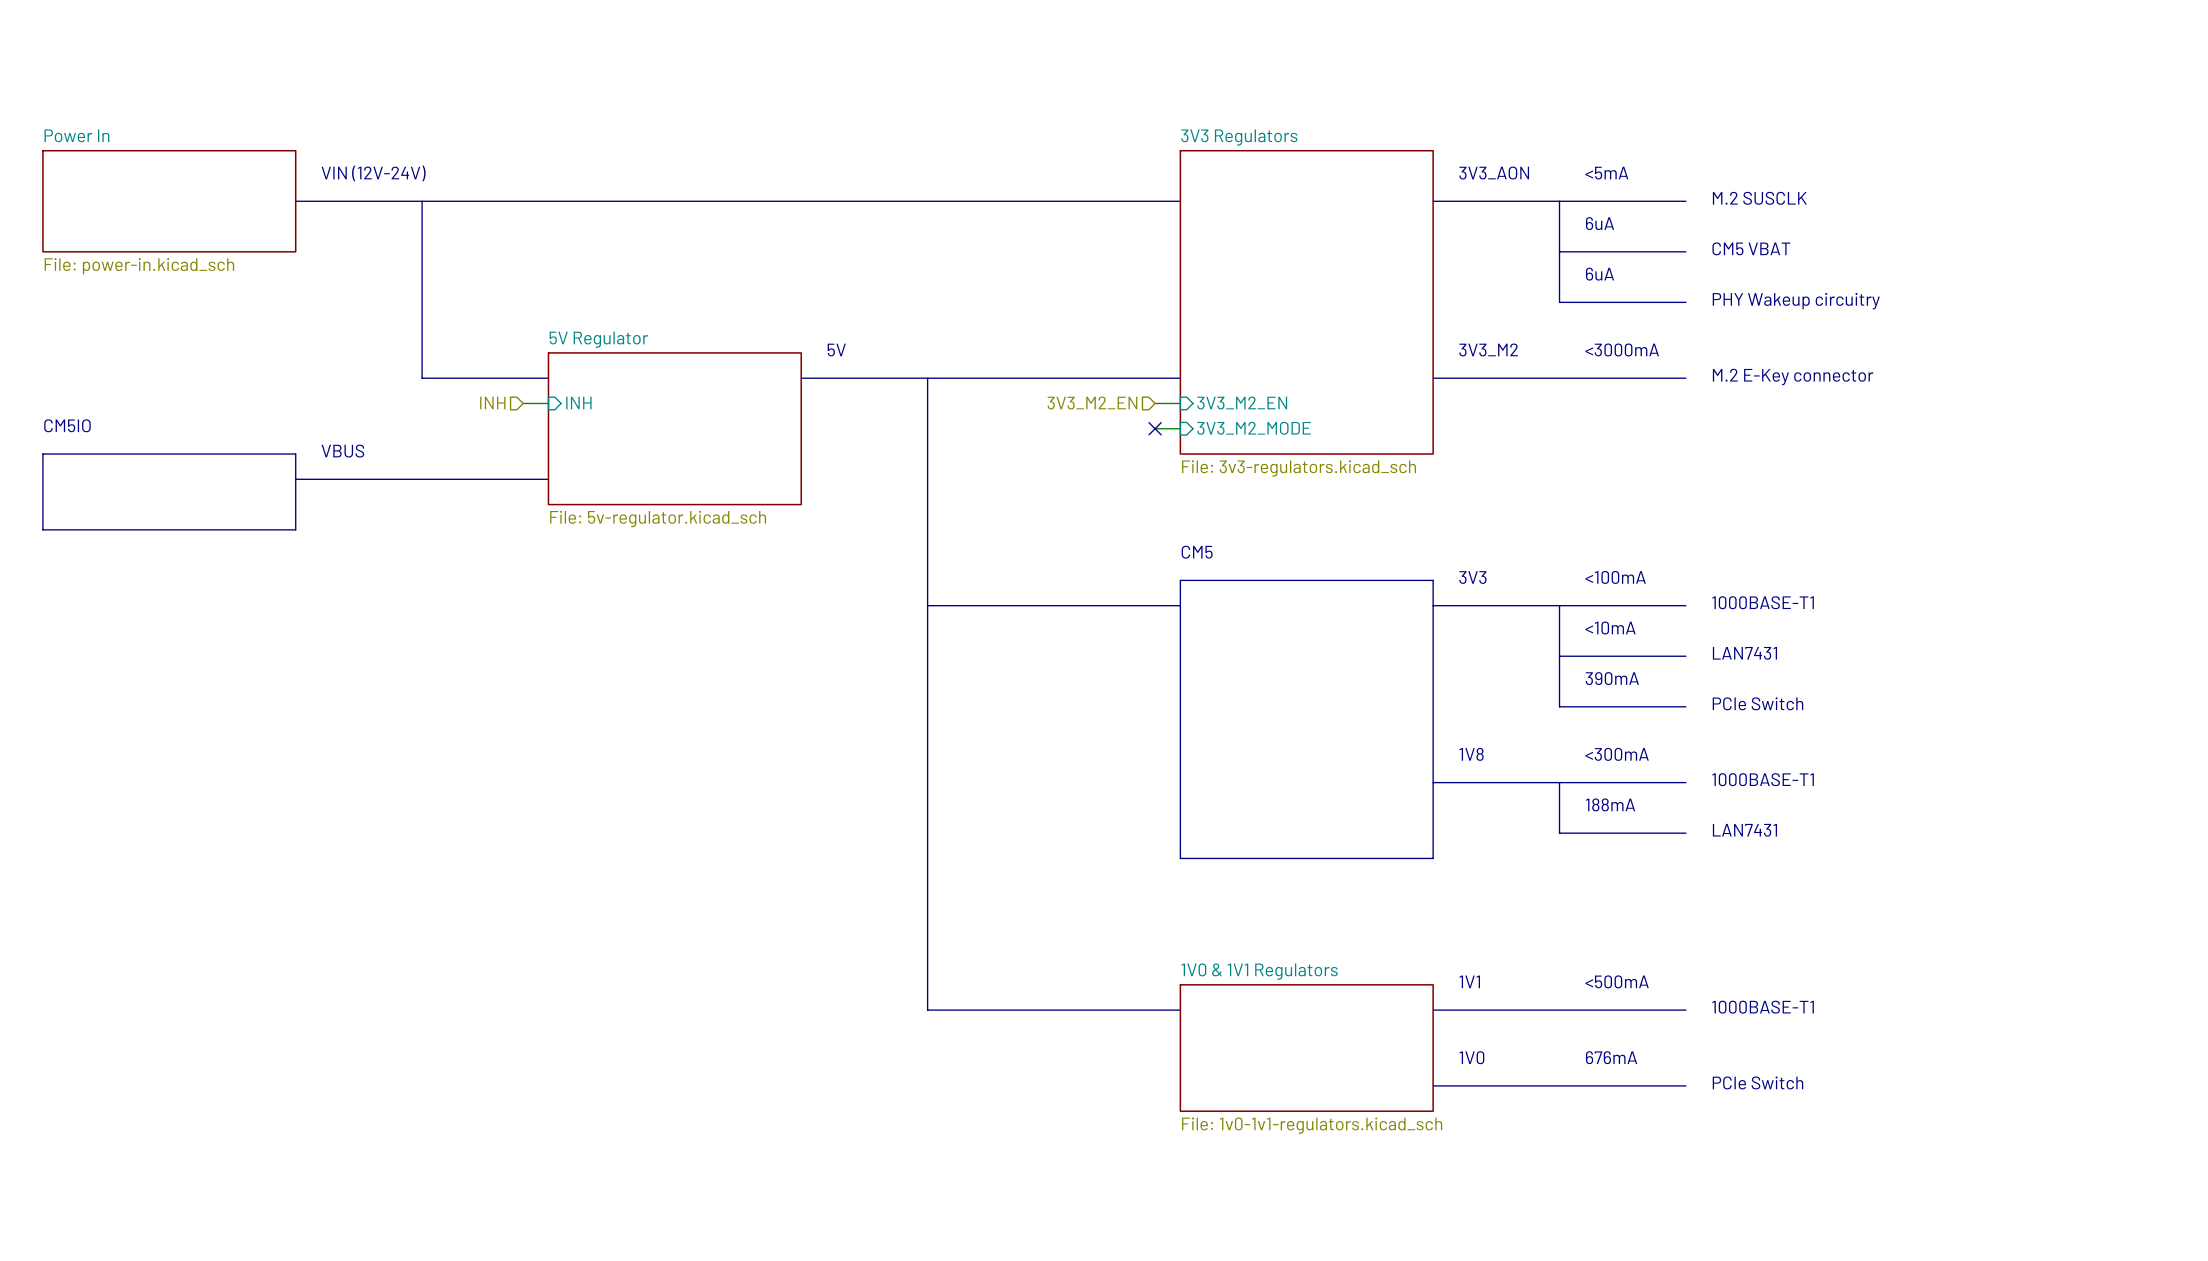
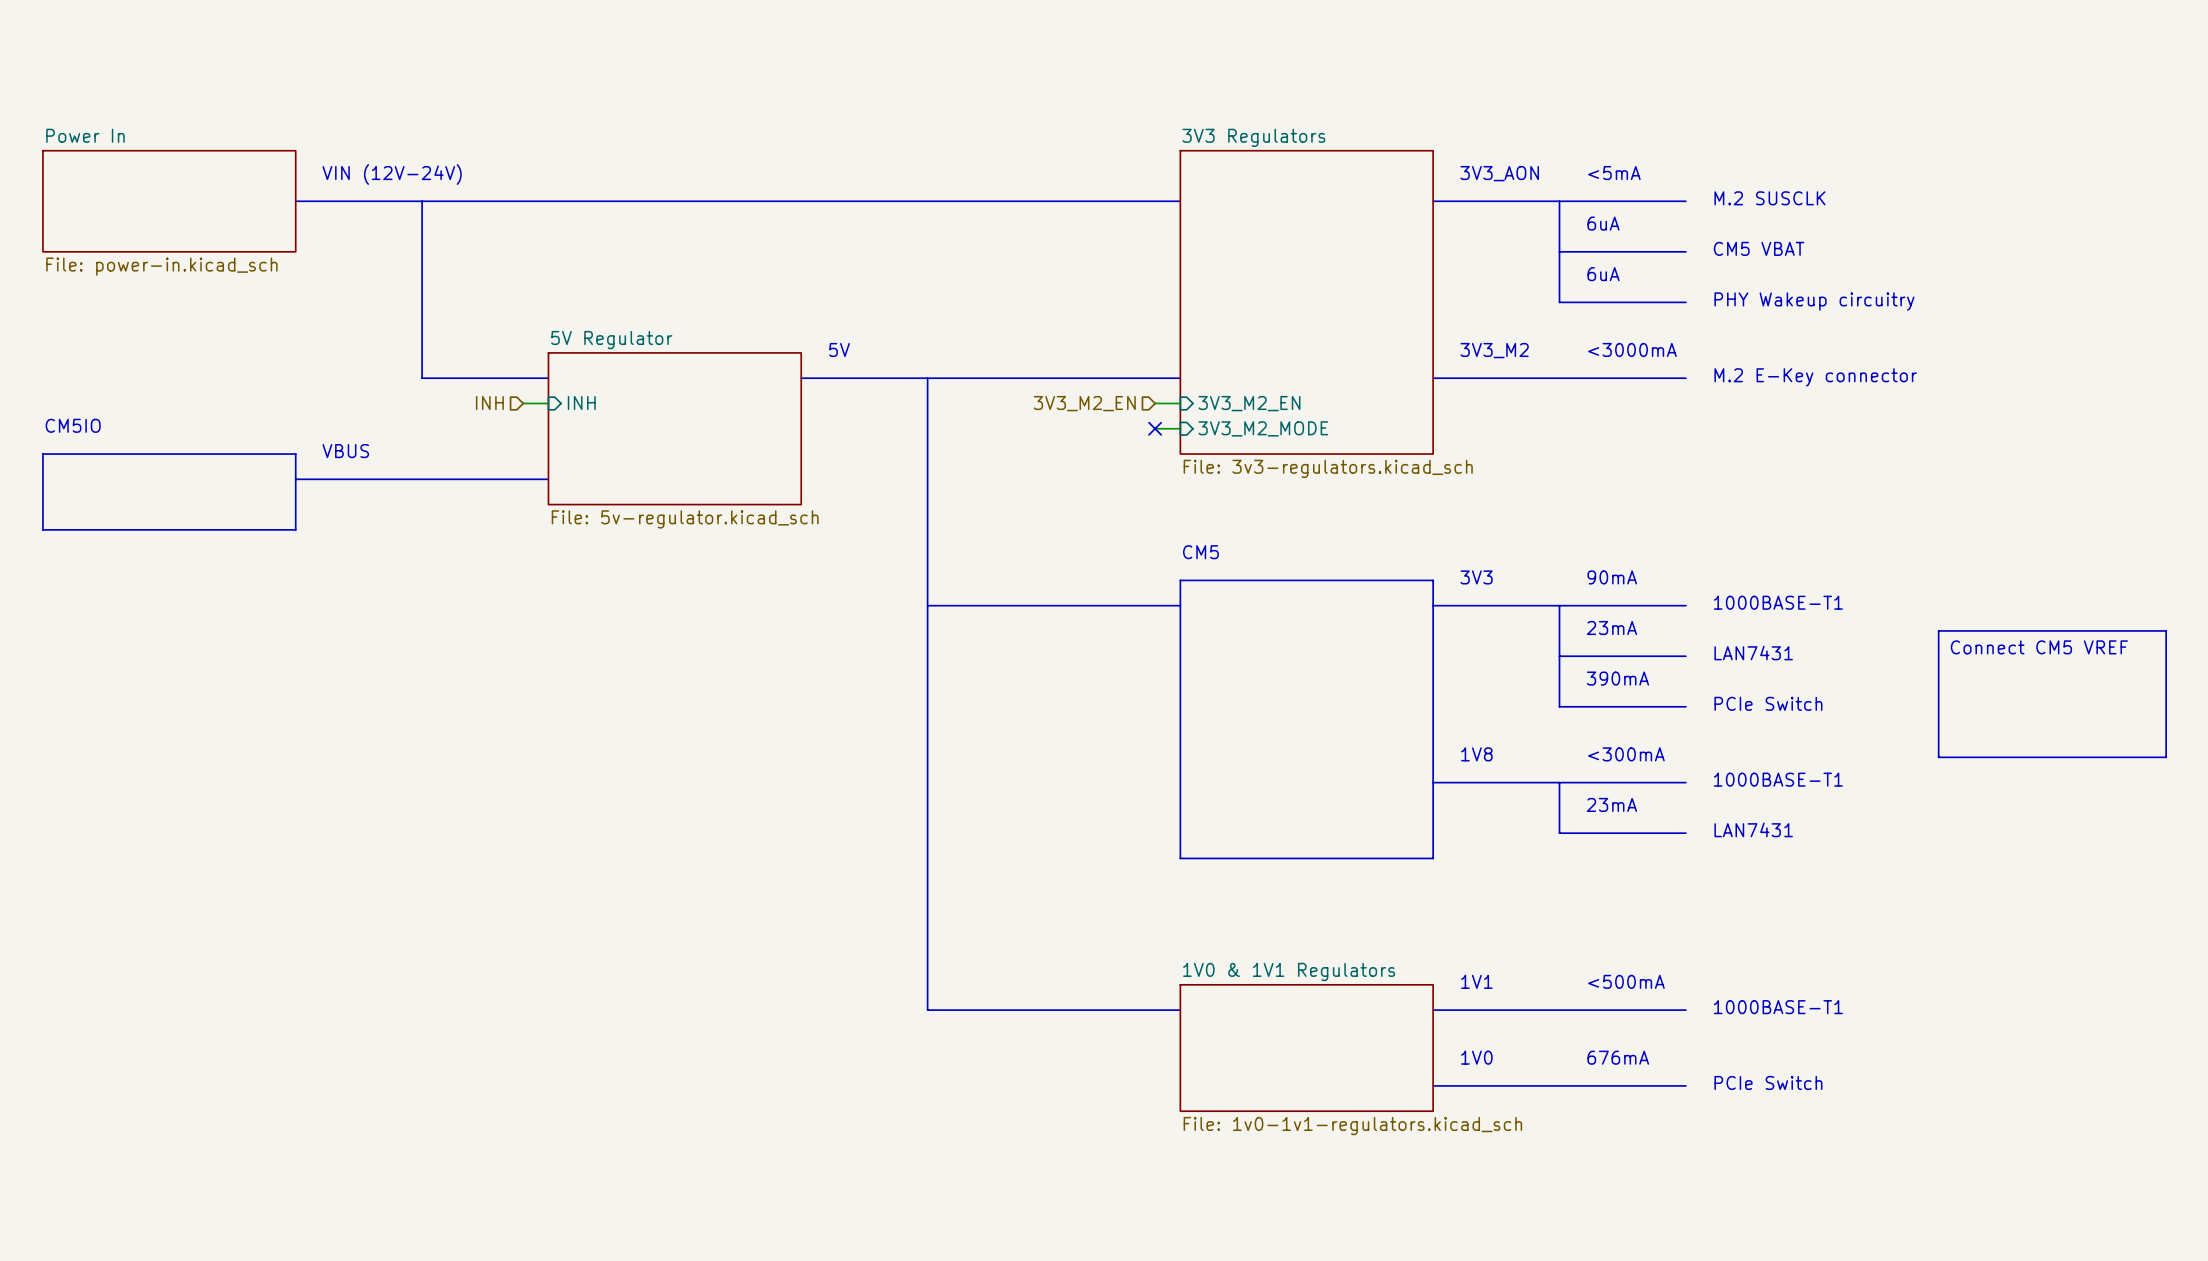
text: <100mA (1615, 577) -> 90mA (1612, 577)
text: <10mA (1610, 628) -> 23mA (1611, 628)
line: none -> (1938, 630) (2166, 630) (2166, 757) (1938, 757) (1938, 630)
text: none -> Connect CM5 VREF (2039, 647)
text: 188mA (1610, 804) -> 23mA (1611, 804)

